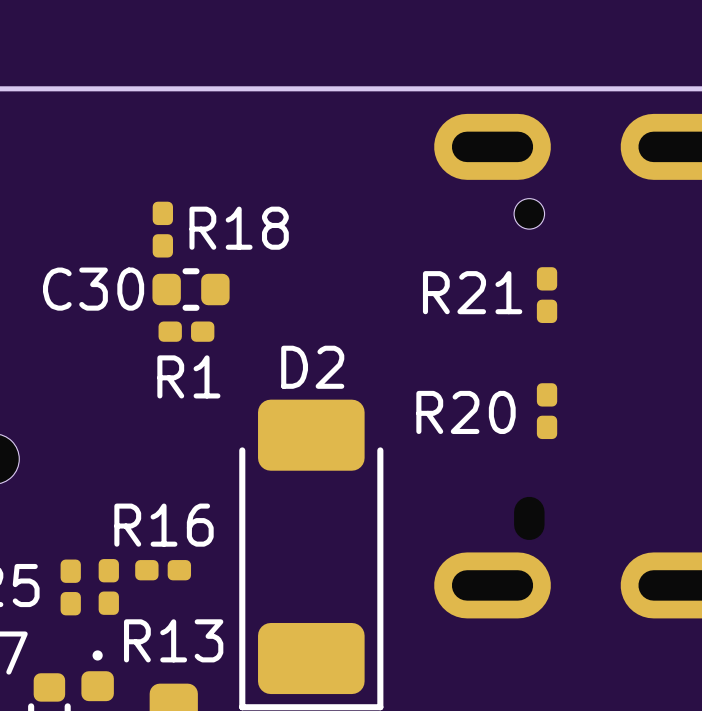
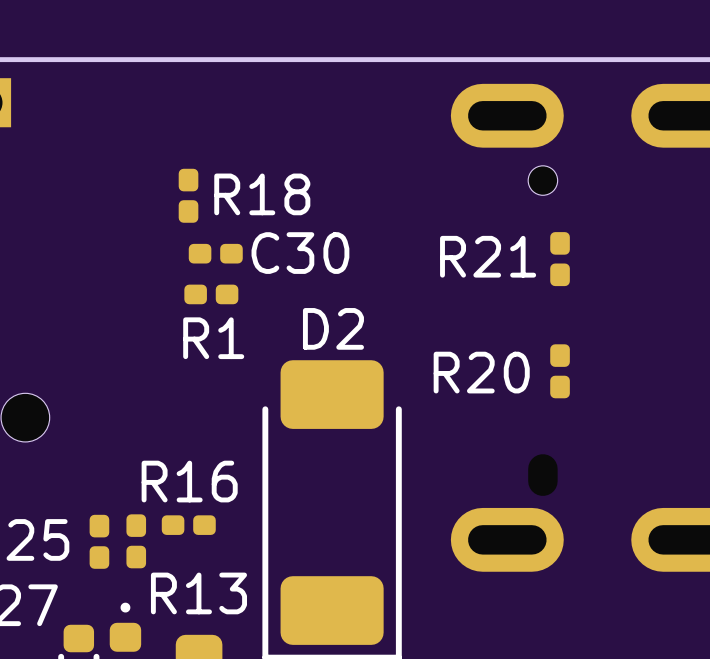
C30 footprint: [152, 268, 230, 311] -> [188, 243, 243, 264]
C30 name position: C30 (93, 289) -> C30 (300, 253)

